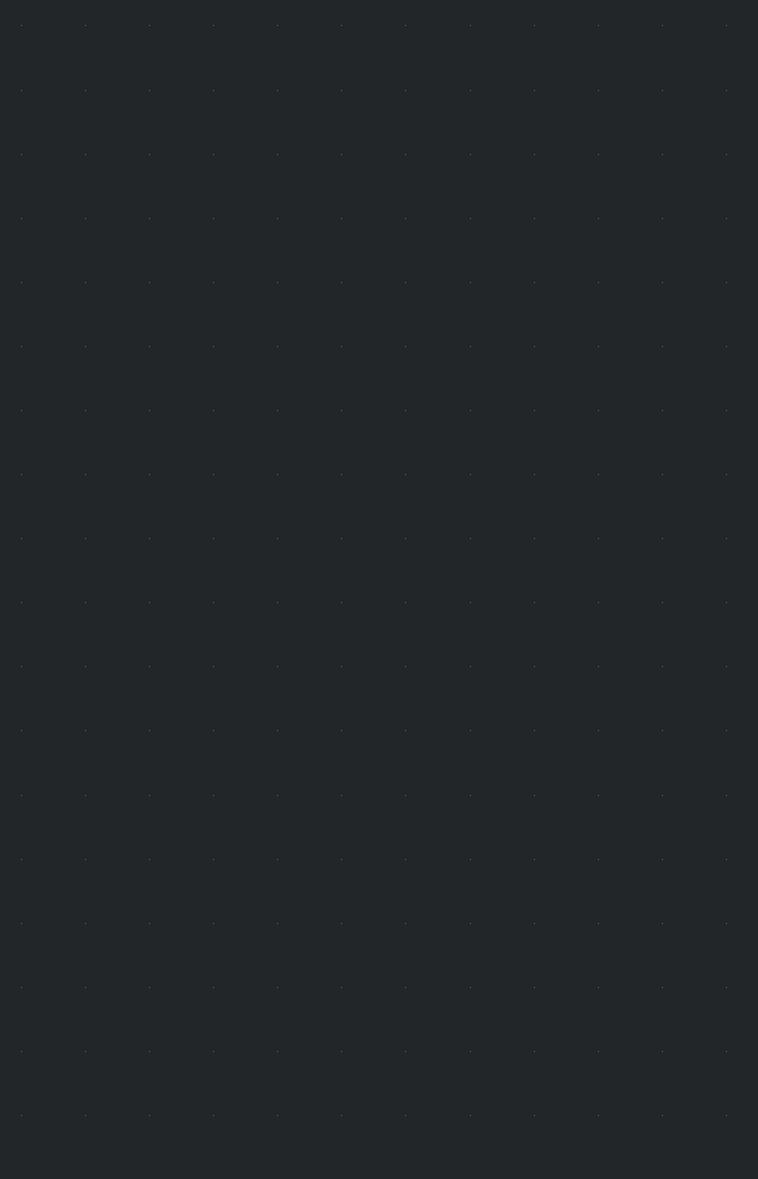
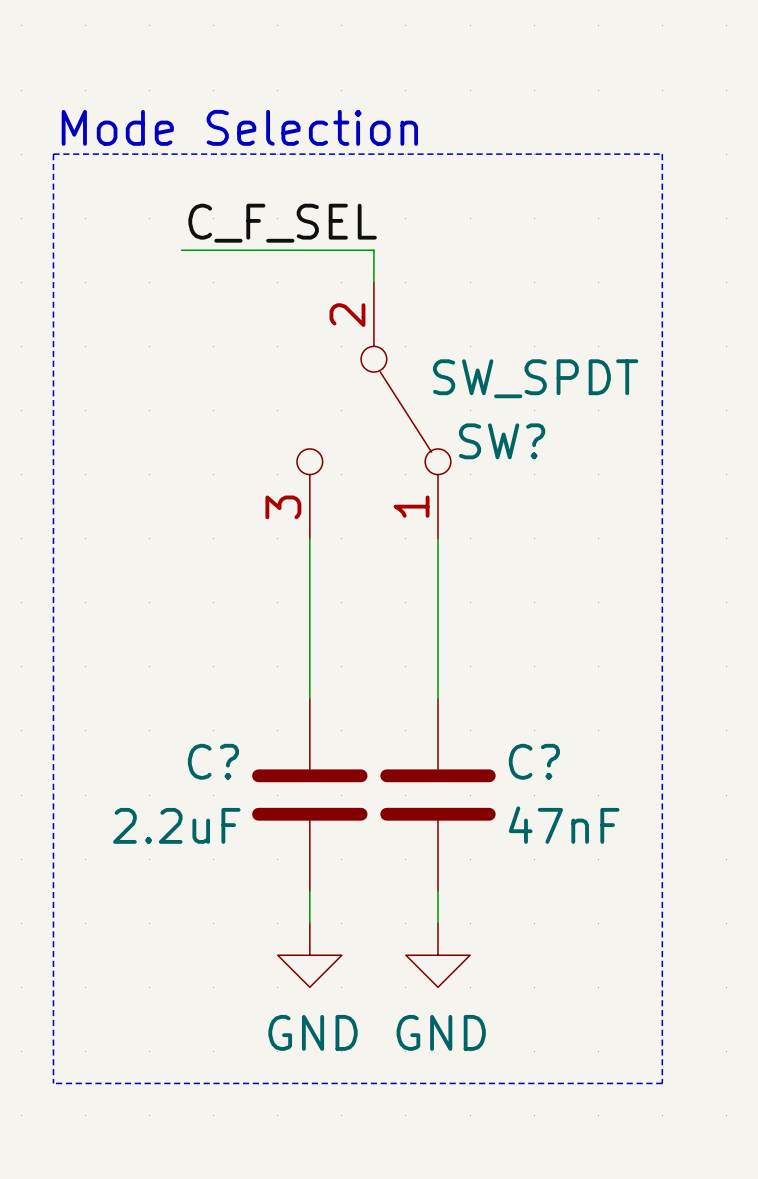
text: none -> Mode Selection (239, 127)
line: none -> (53, 154) (662, 154) (662, 1083) (53, 1083) (53, 154)
label: none -> C_F_SEL (282, 223)
wire: none -> (181, 250) (373, 250) (373, 282)
SW?: none -> SW_SPDT (373, 410)
wire: none -> (309, 538) (309, 698)
wire: none -> (438, 538) (438, 698)
C?: none -> 2.2uF (309, 795)
C?: none -> 47nF (438, 795)
wire: none -> (309, 891) (309, 923)
wire: none -> (438, 891) (438, 923)
power symbol: none -> GND (309, 955)
power symbol: none -> GND (438, 955)

